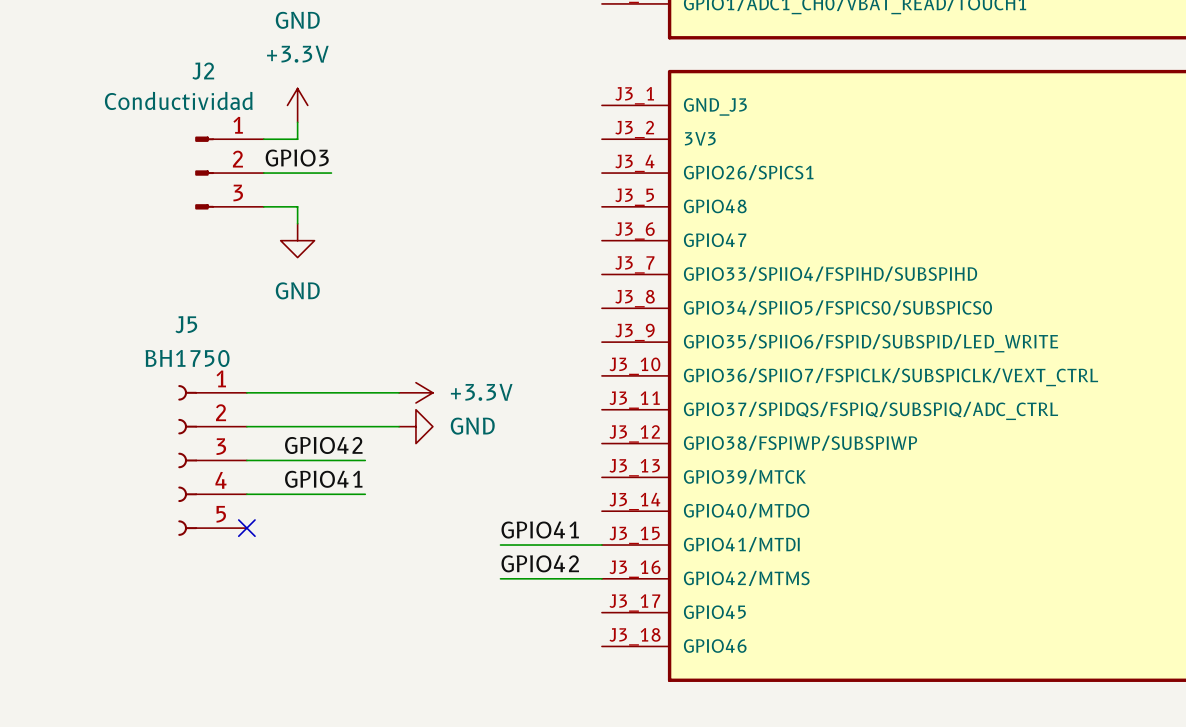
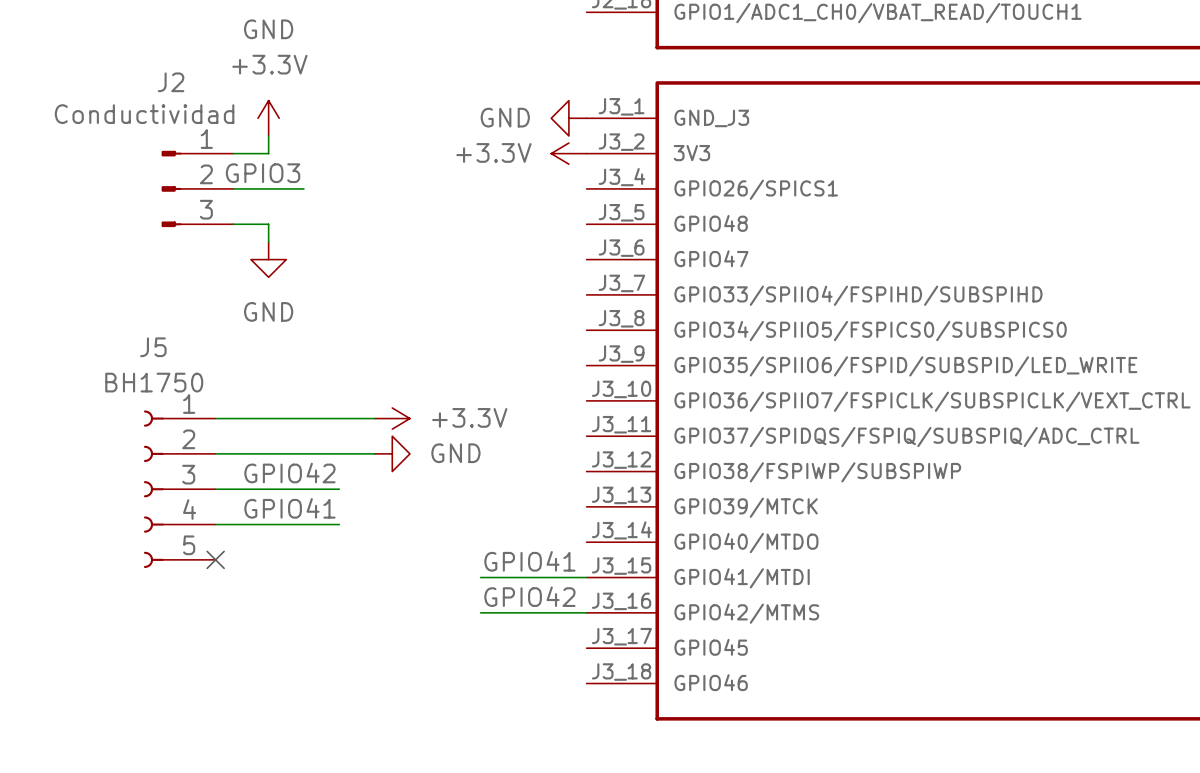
power symbol: none -> GND (568, 118)
power symbol: none -> +3.3V (568, 153)

